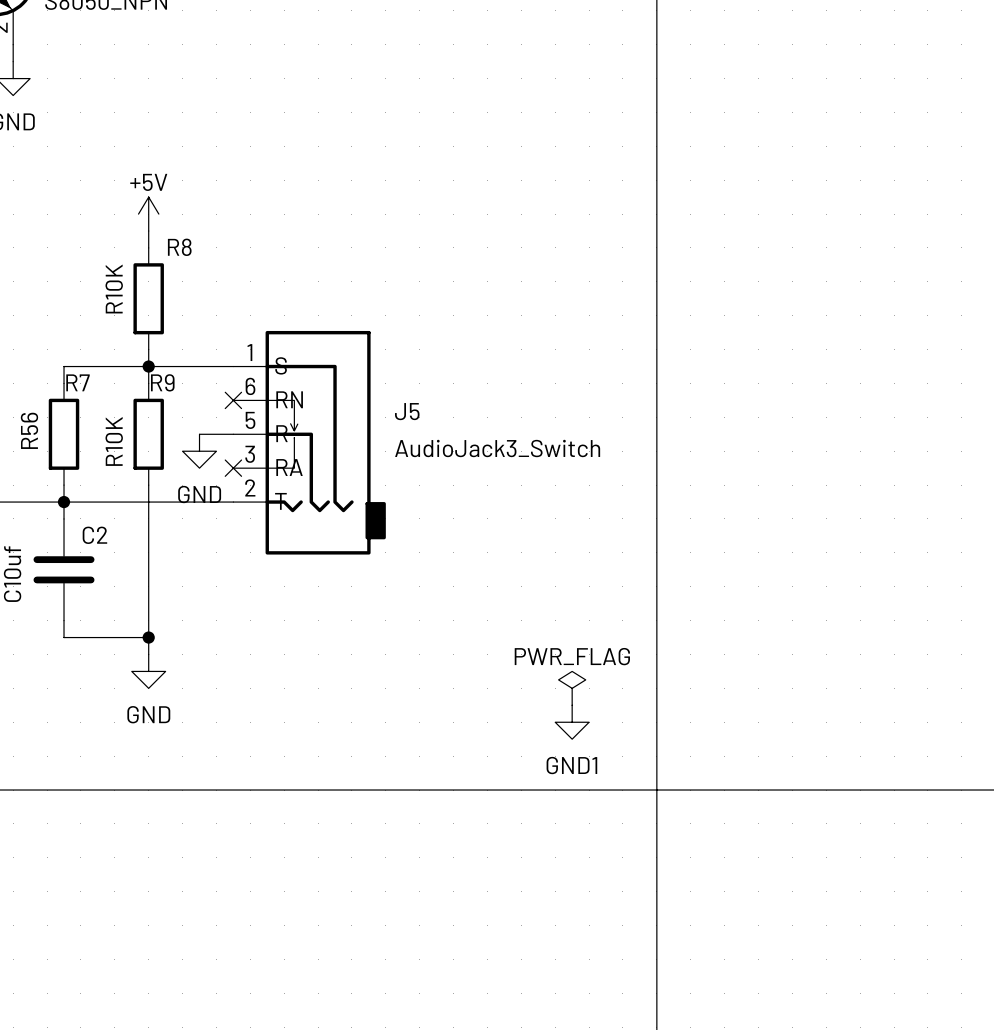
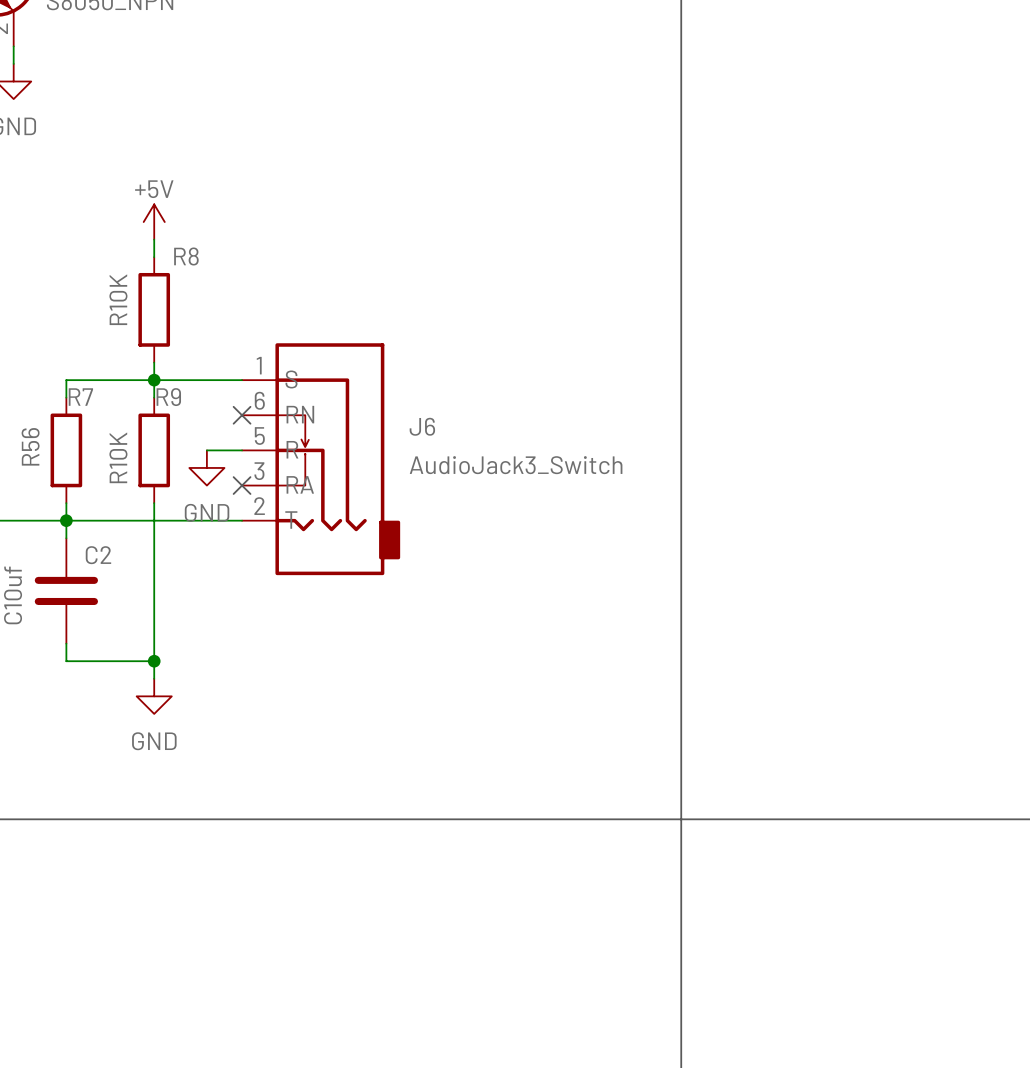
J5 name: J5 (407, 411) -> J6 (422, 426)
power symbol: PWR_FLAG (572, 688) -> none
power symbol: GND1 (572, 722) -> none

